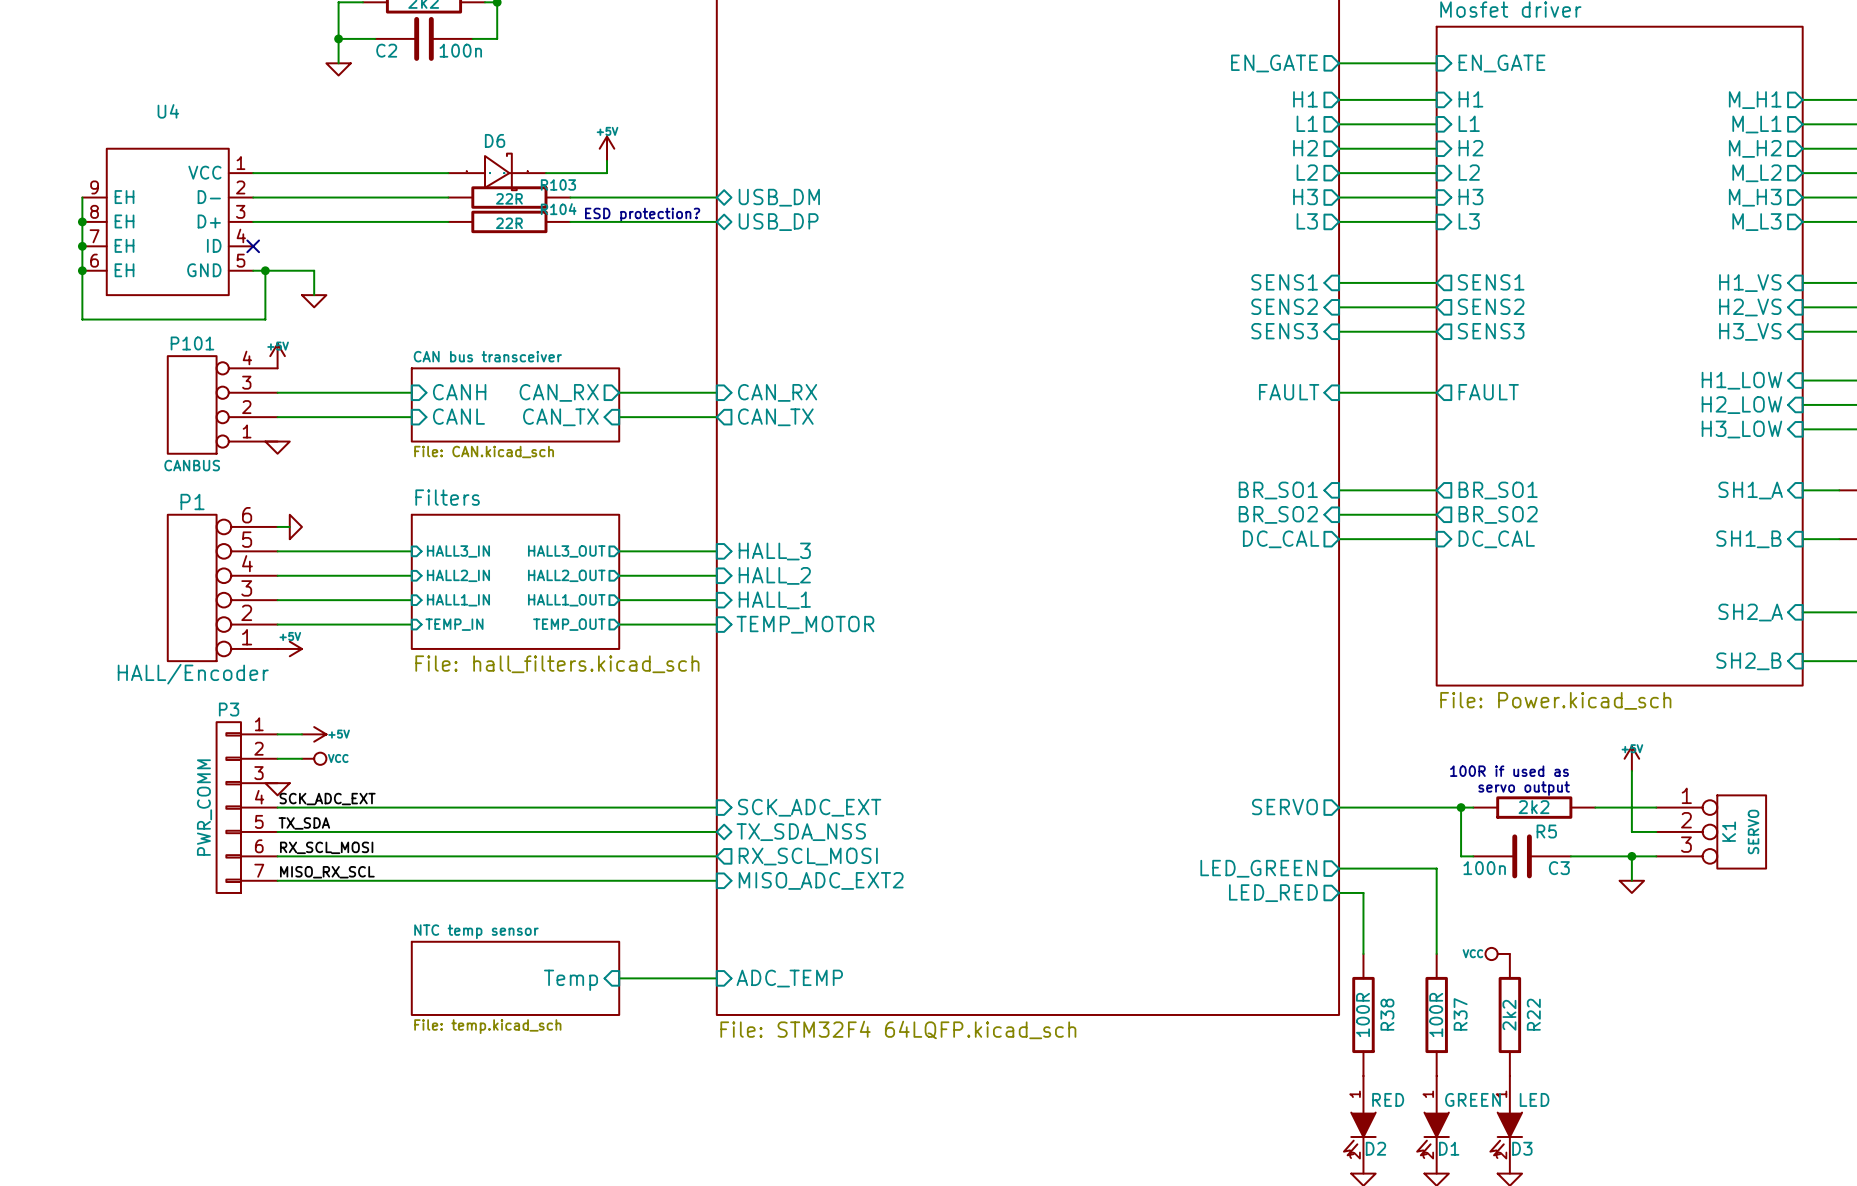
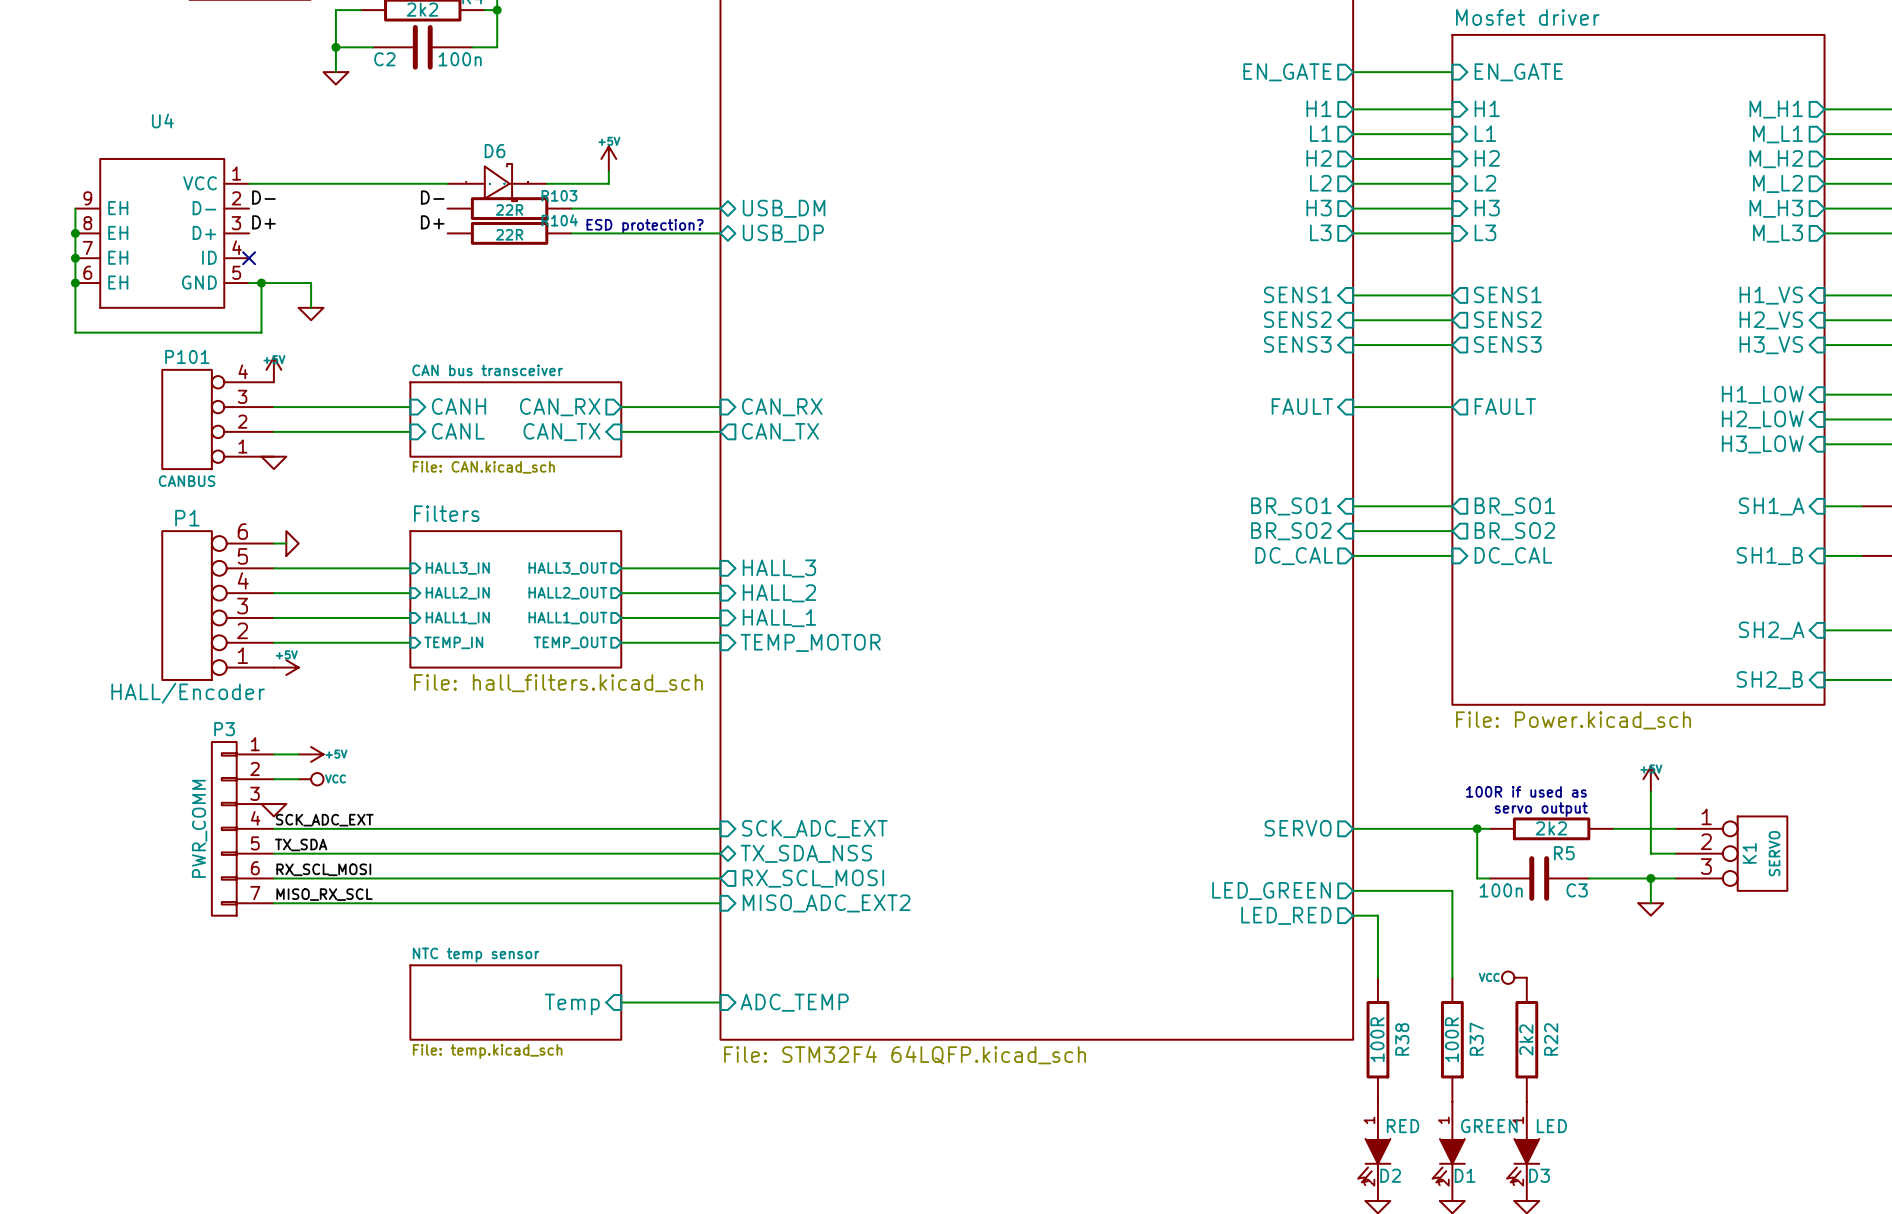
label: none -> D- (263, 197)
label: none -> D- (432, 197)
wire: (253, 197) (448, 197) -> none
label: none -> D+ (263, 222)
label: none -> D+ (432, 222)
wire: (253, 221) (448, 221) -> none

